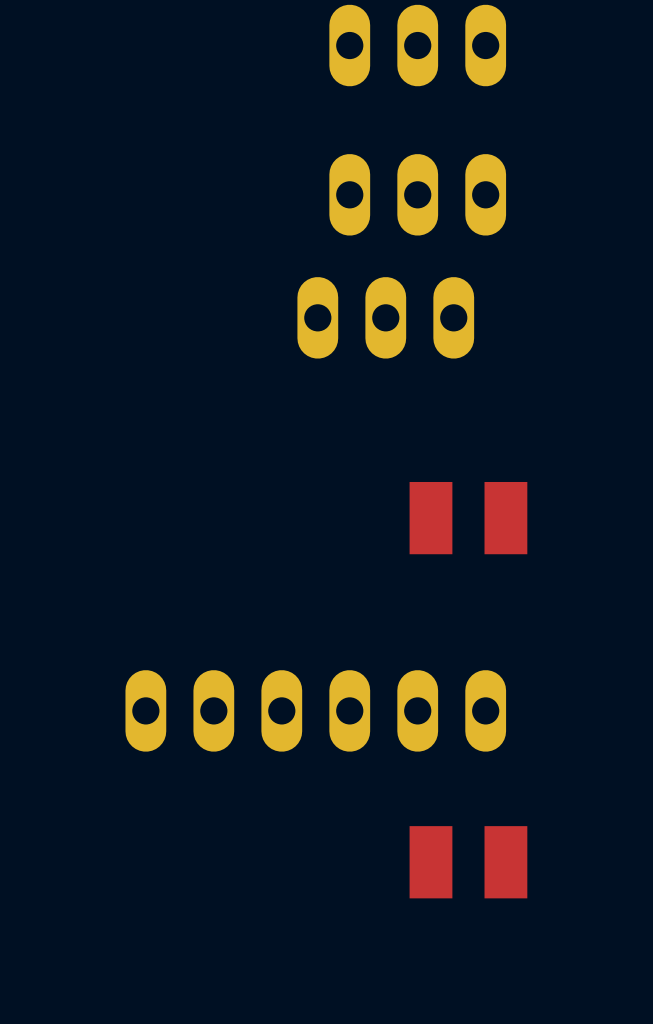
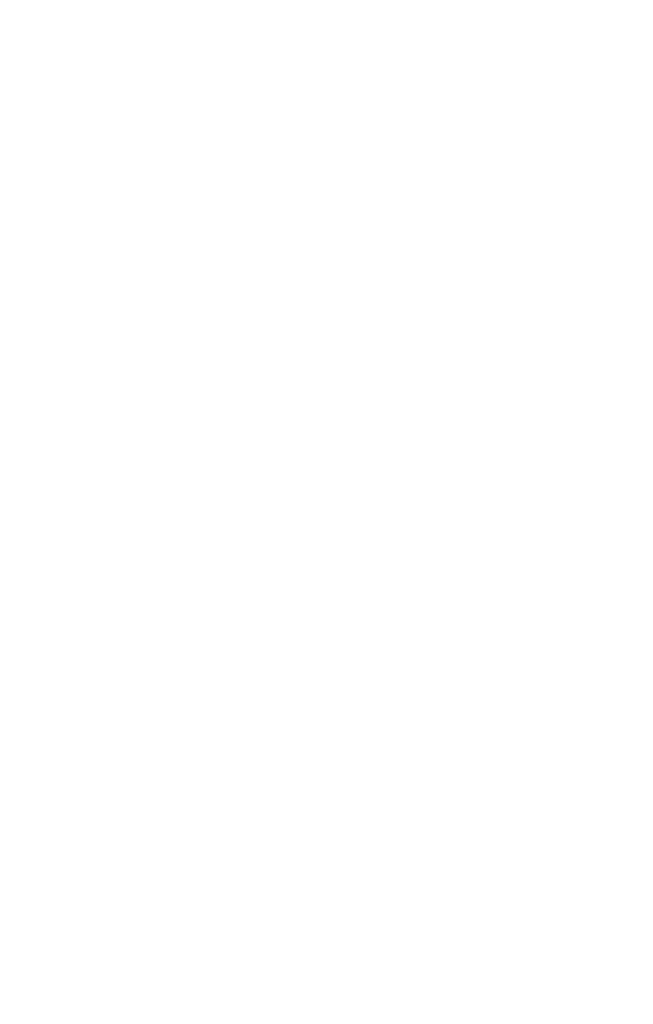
part: (417, 45) -> none
part: (417, 194) -> none
part: (385, 317) -> none
part: (468, 518) -> none
part: (315, 710) -> none
part: (468, 862) -> none

